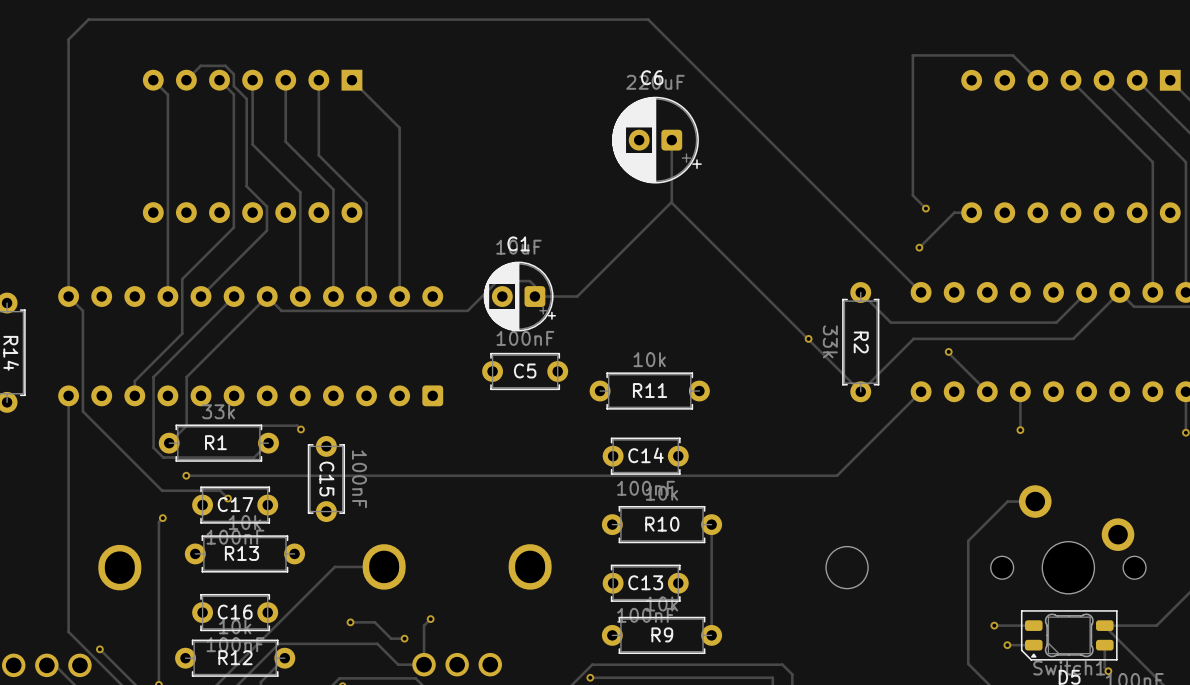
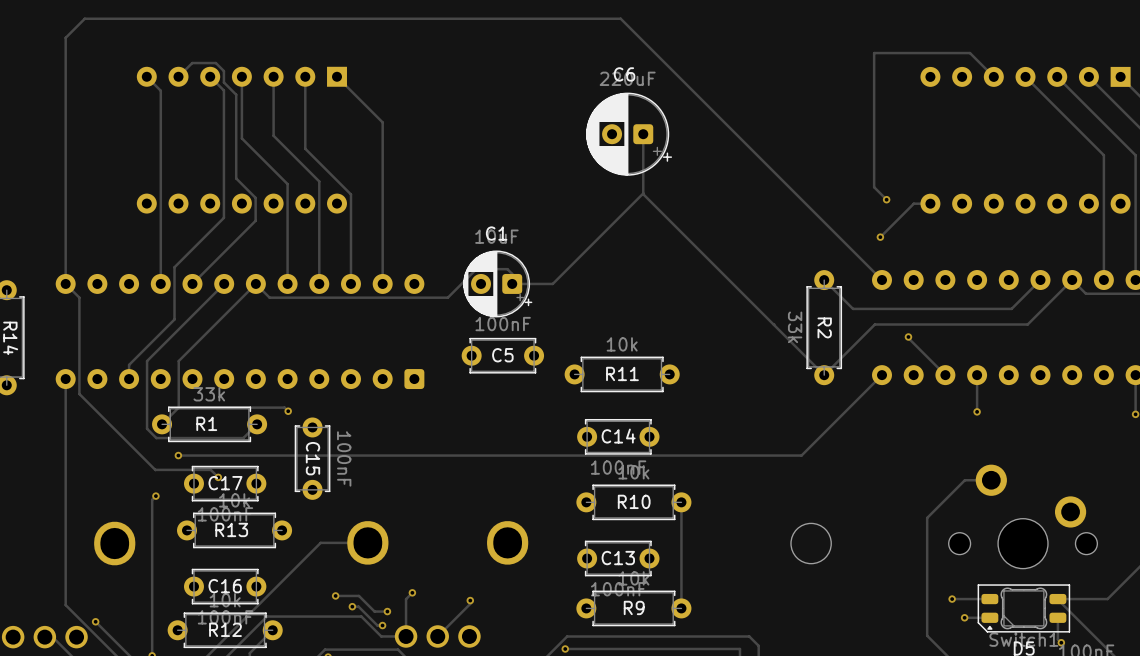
via: (808, 338) -> none
track: none -> (470, 600) (470, 603) (437, 636)
via: none -> (470, 600)
track: none -> (352, 606) (358, 606) (377, 625) (382, 625)
via: none -> (352, 606)
via: none -> (382, 625)

